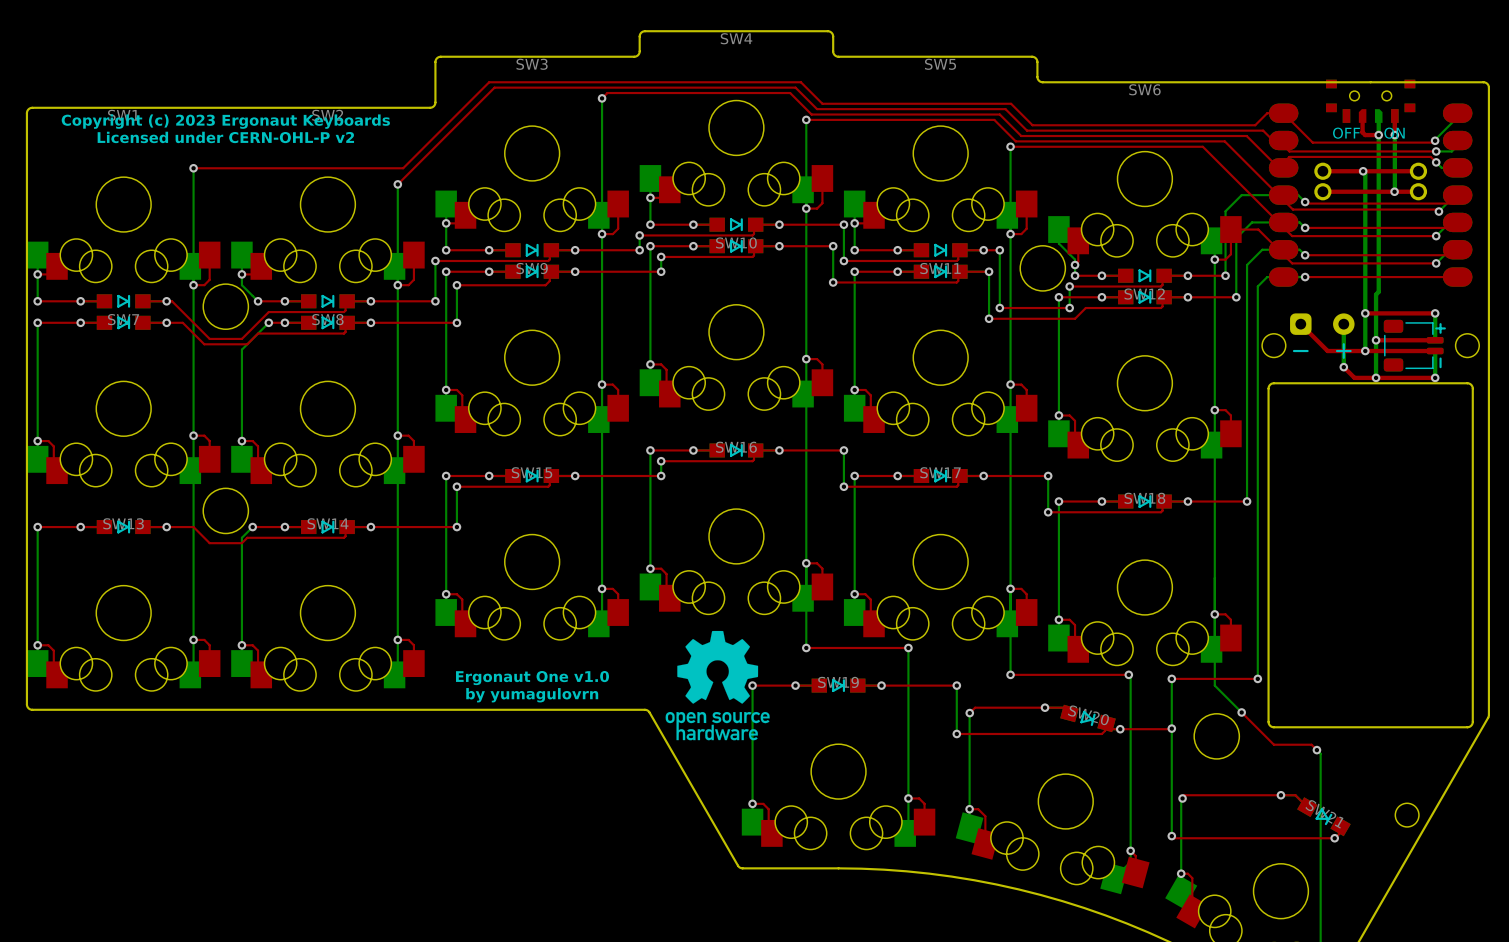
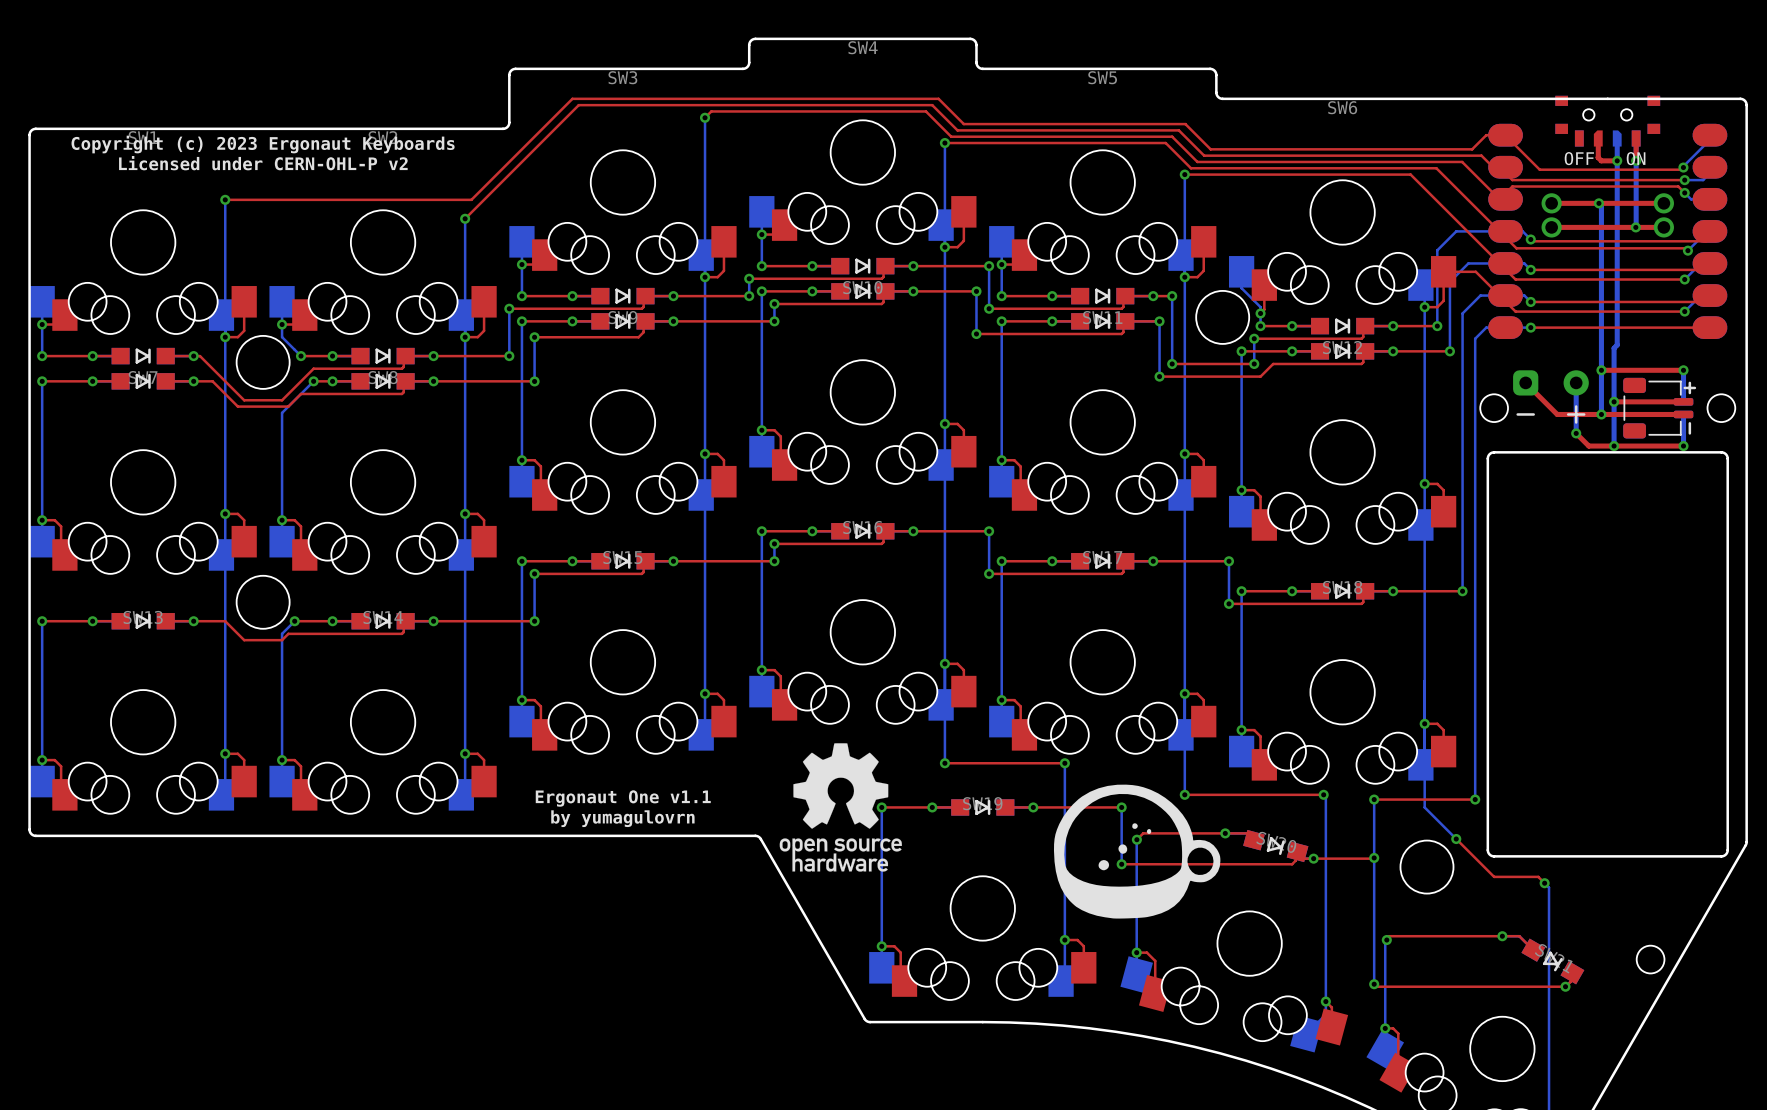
drawing: none -> [1053, 784, 1221, 919]
text: Ergonaut One v1.0 (532, 678) -> Ergonaut One v1.1 (623, 798)

